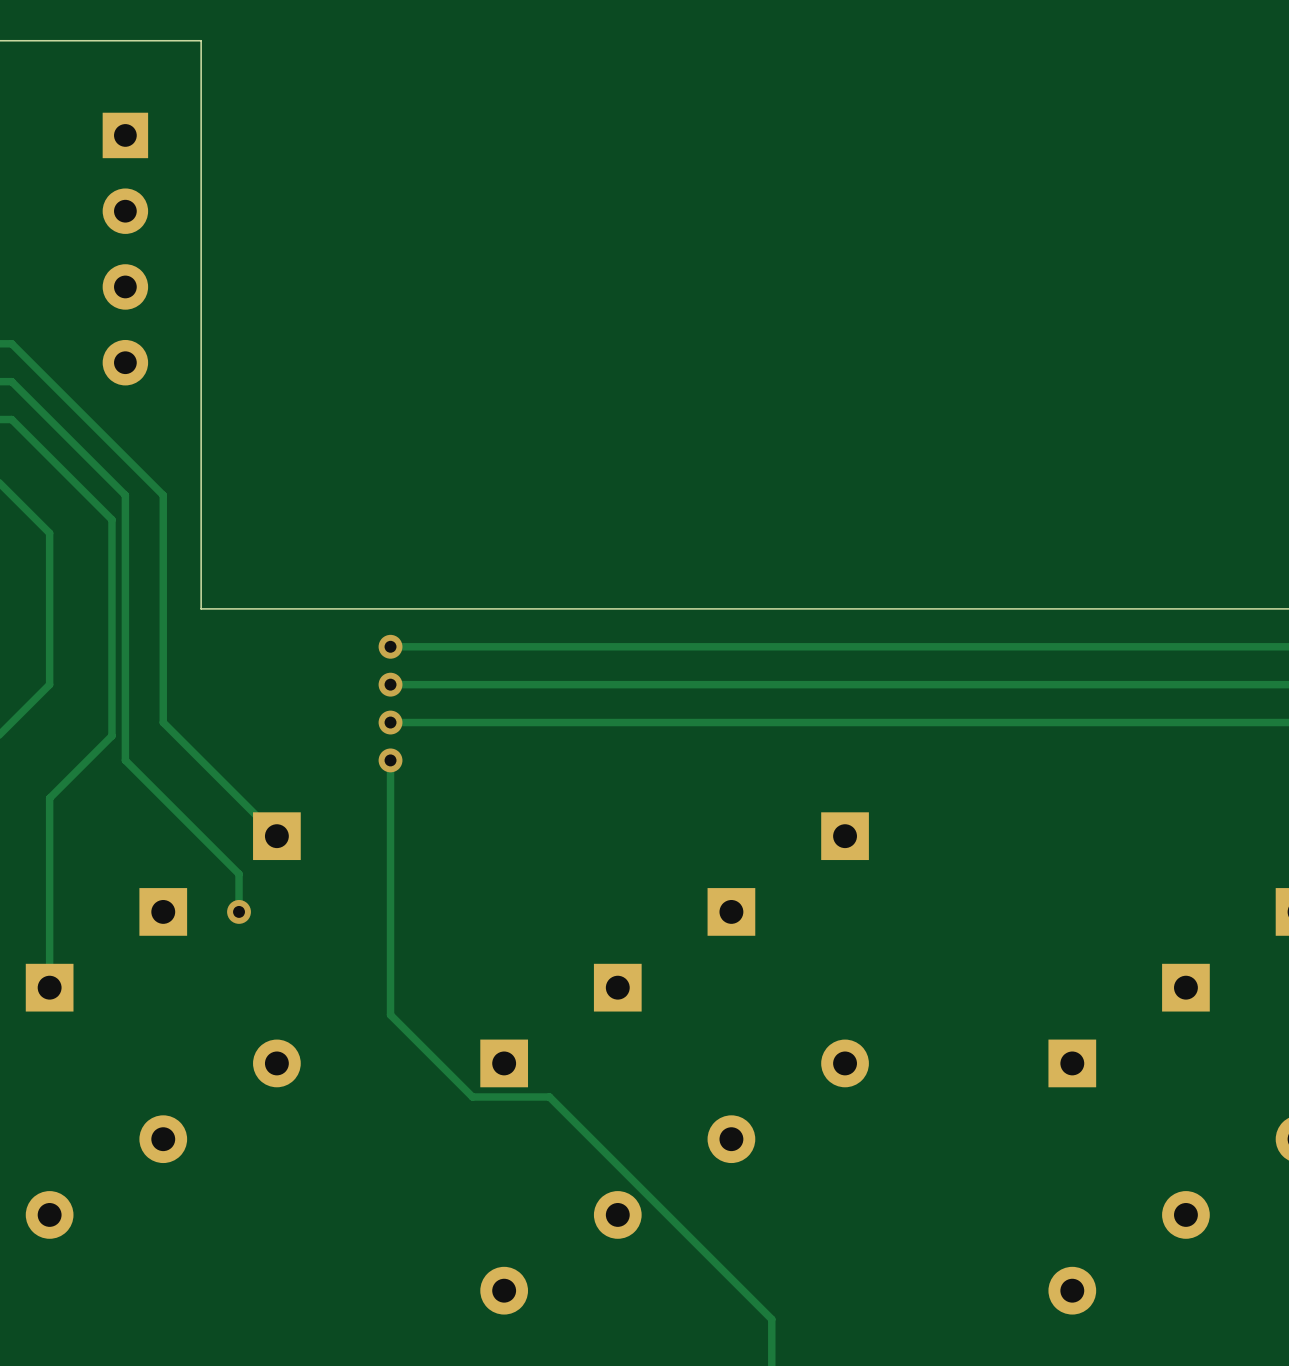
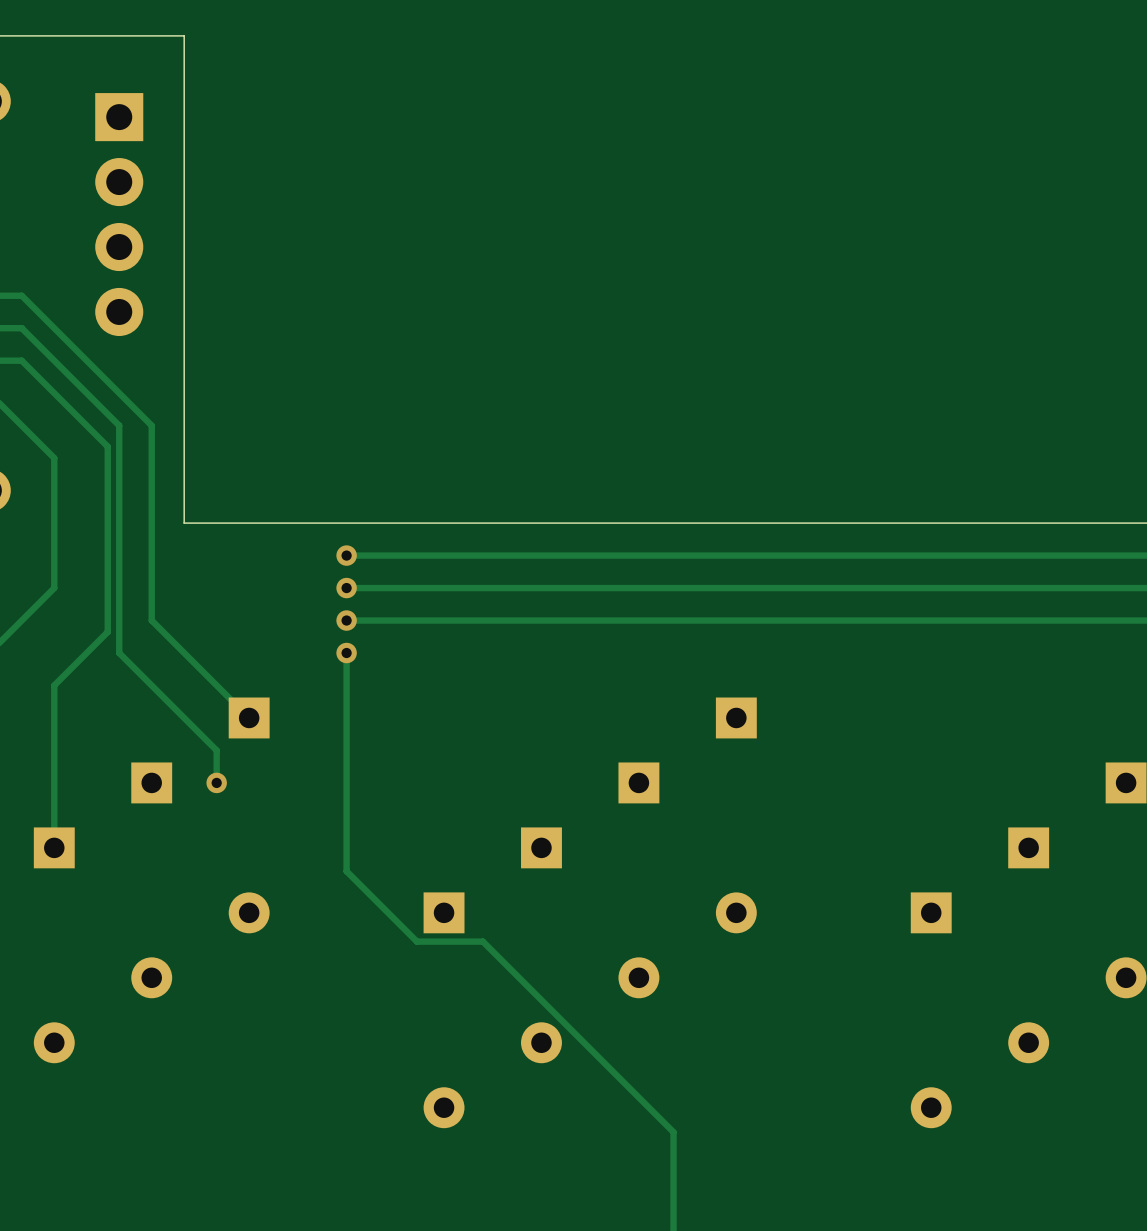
part footprint: [102, 112, 149, 386] -> [95, 93, 144, 337]

